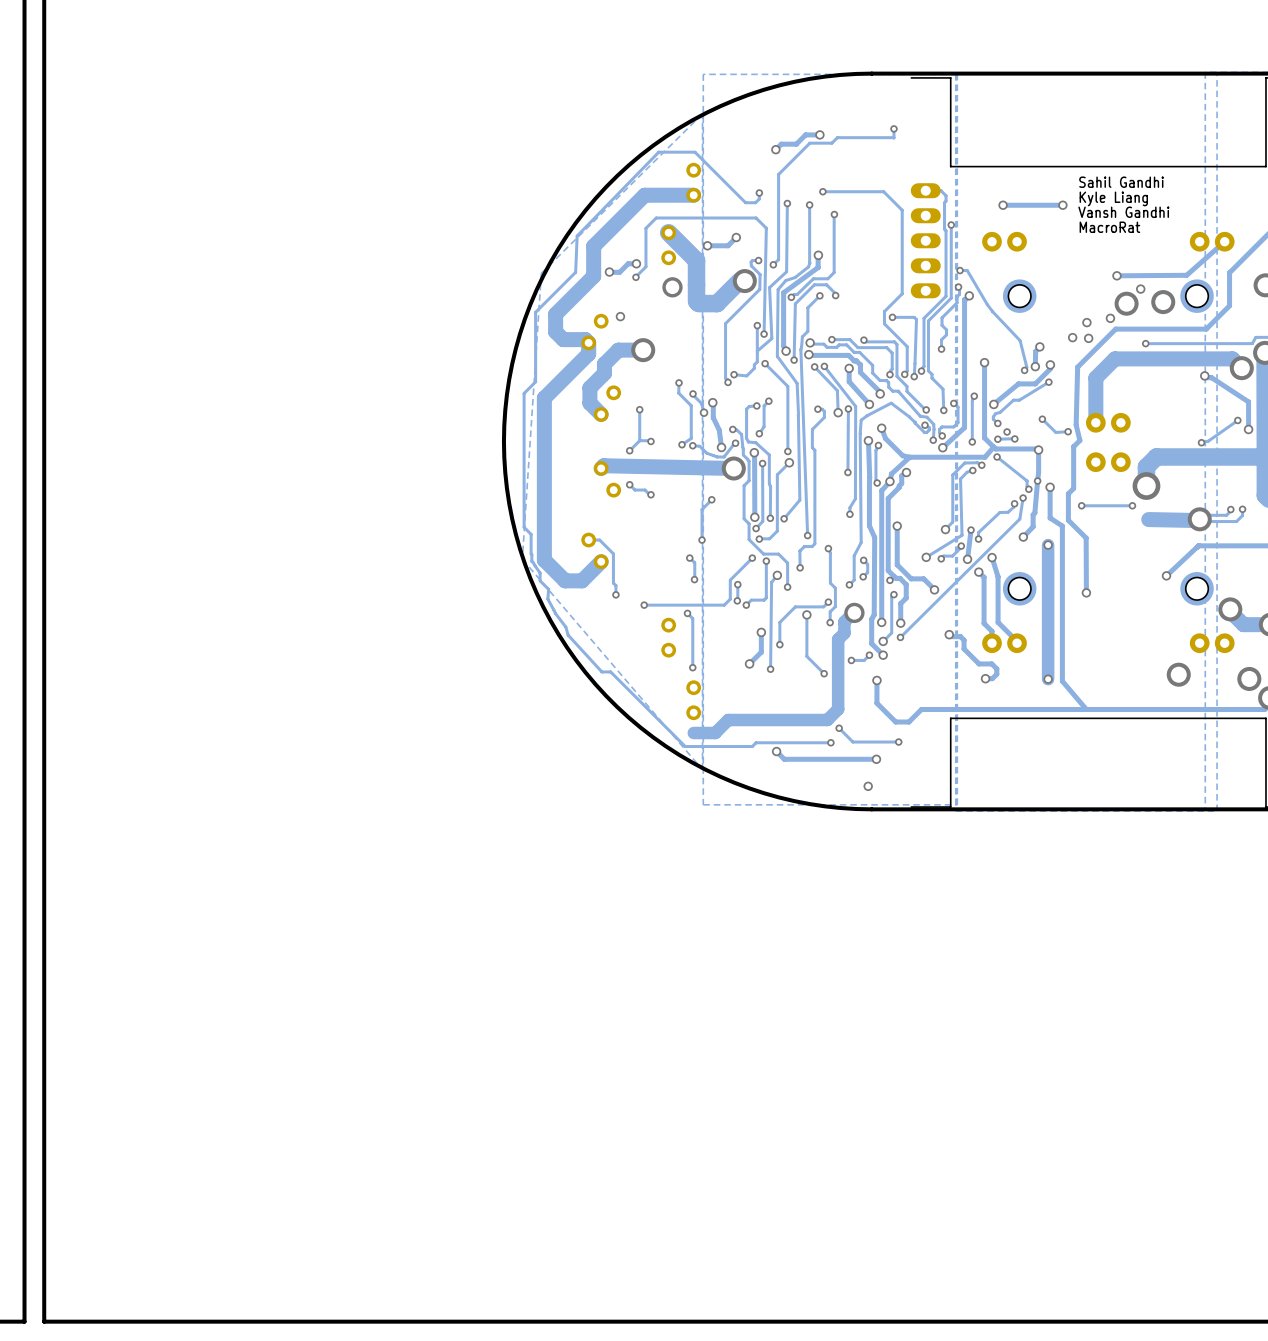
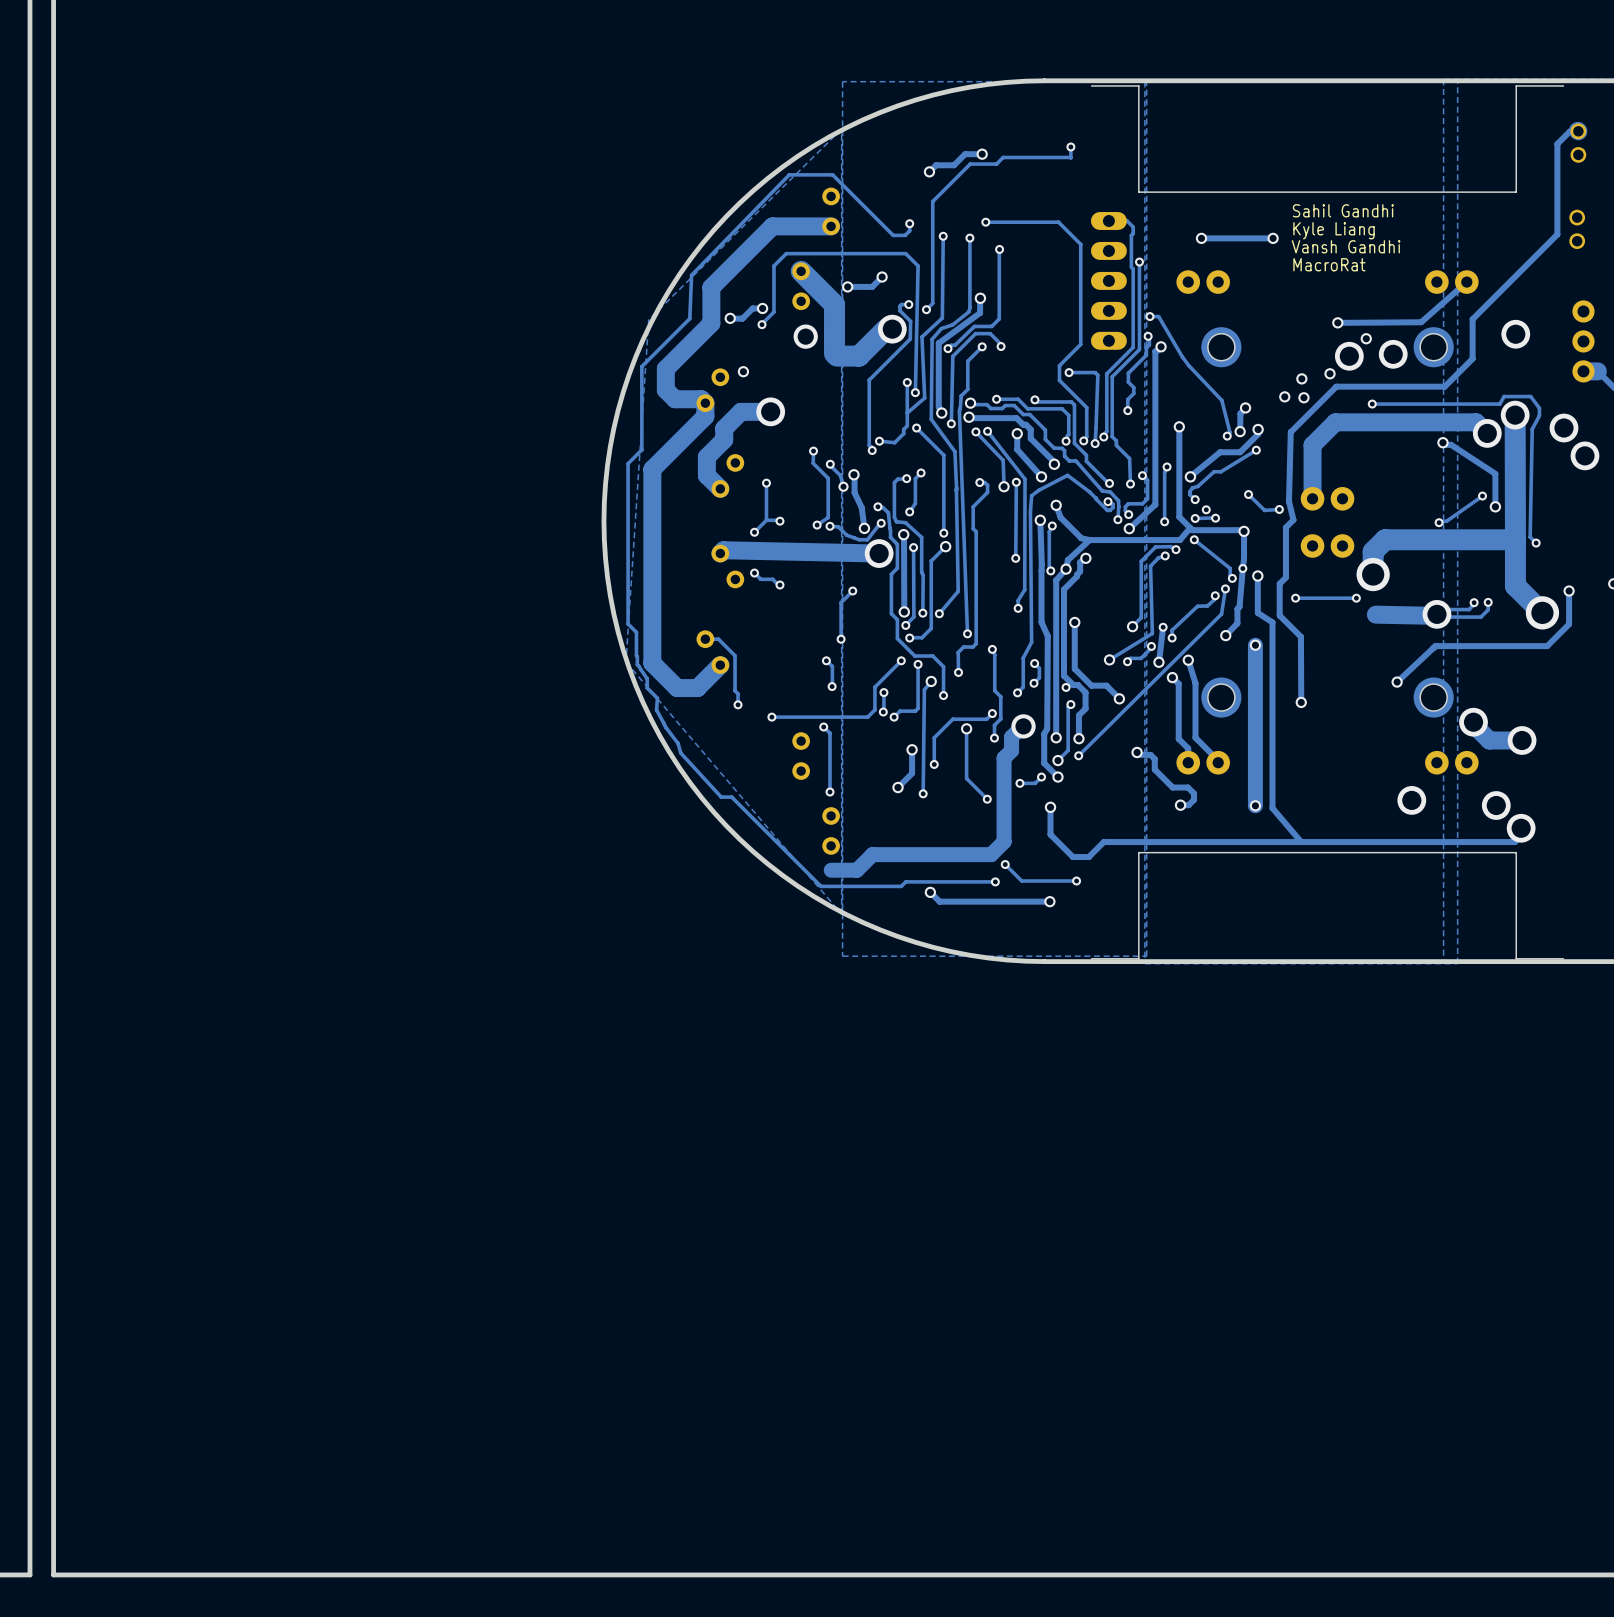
via: (868, 786) -> none

